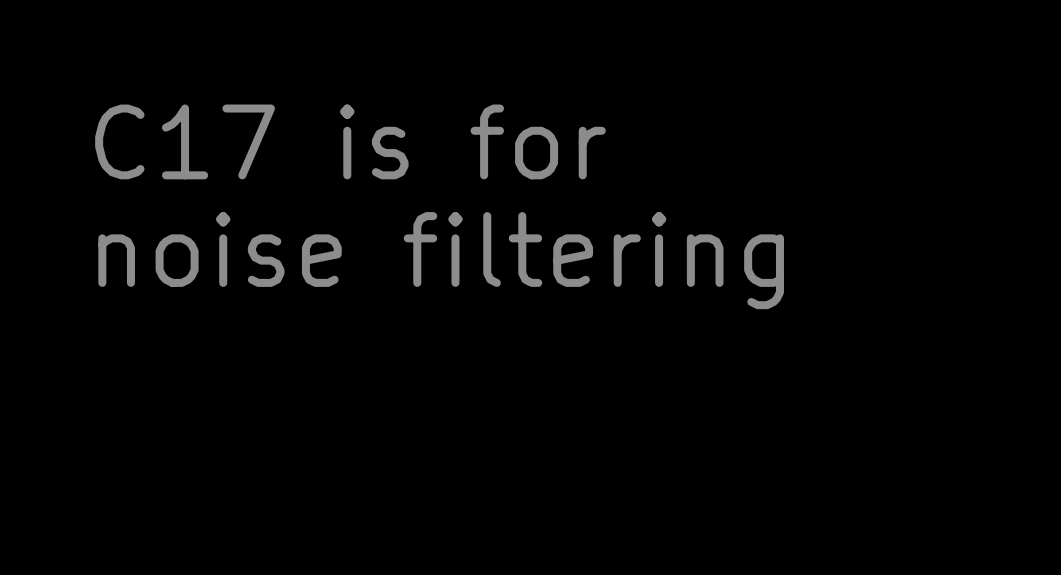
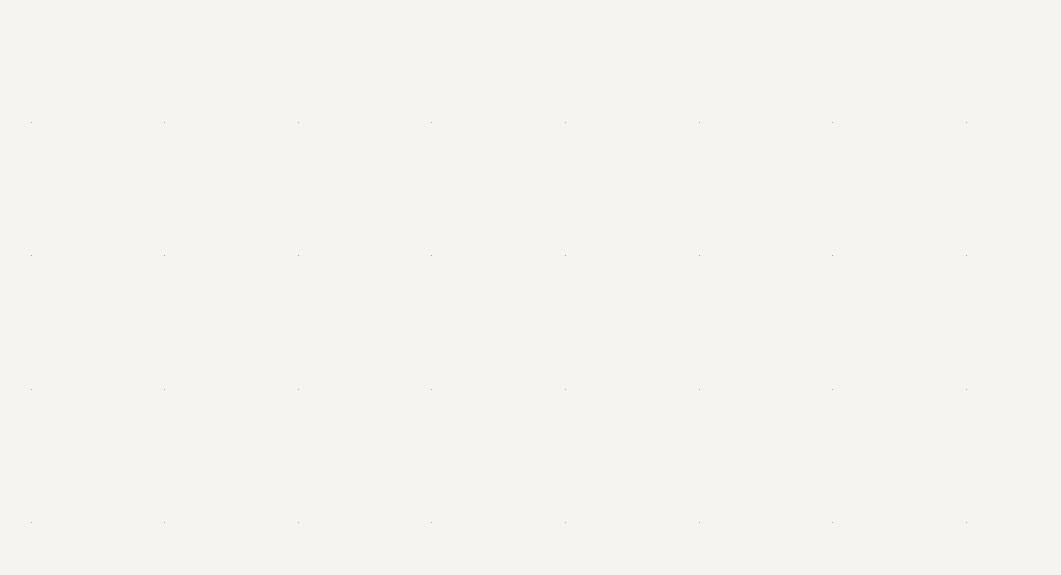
text: C17 is for (350, 141) -> none
text: noise filtering (441, 260) -> none

